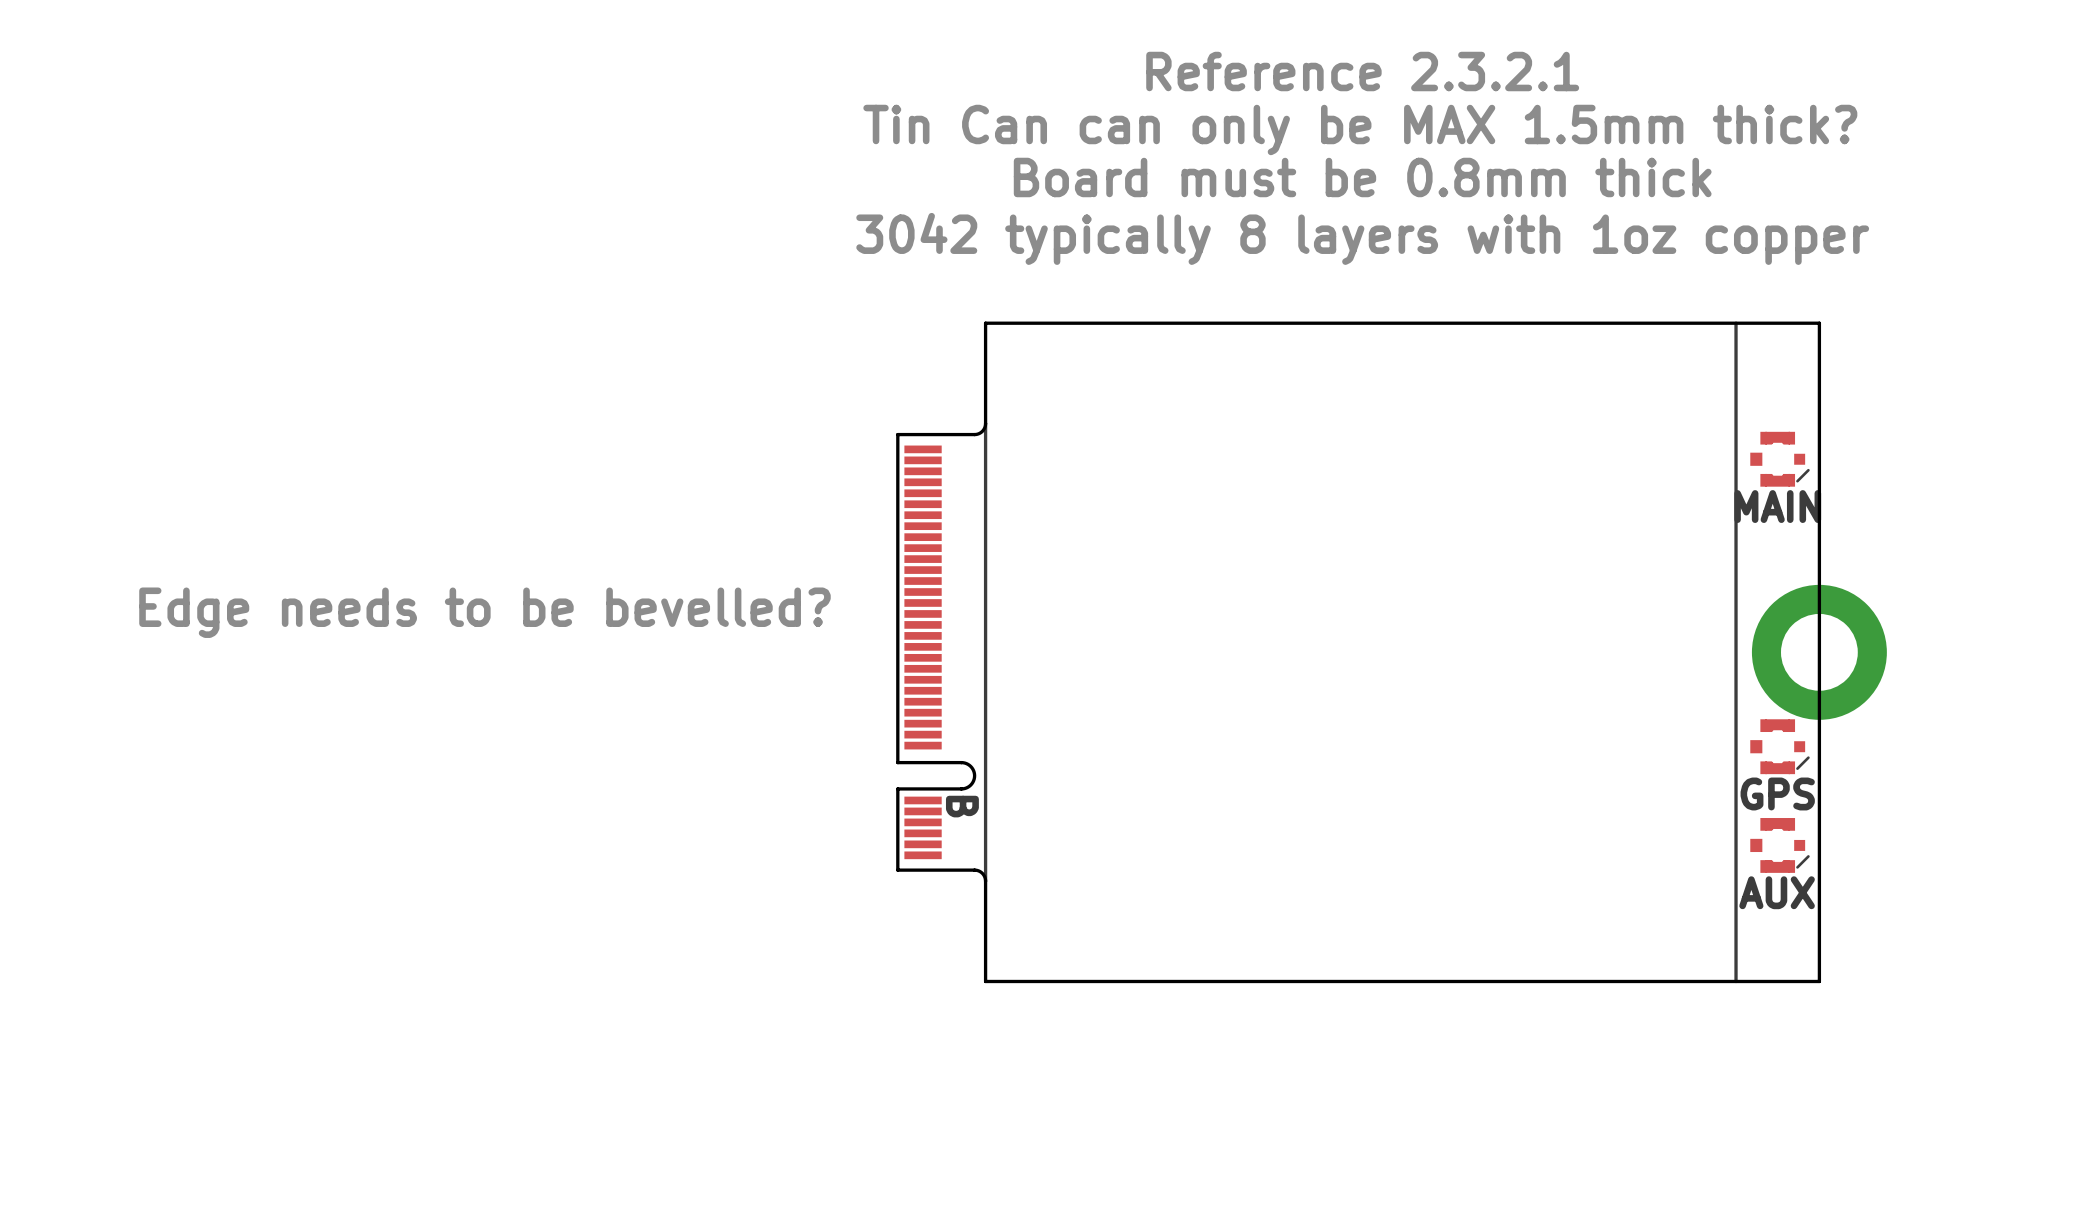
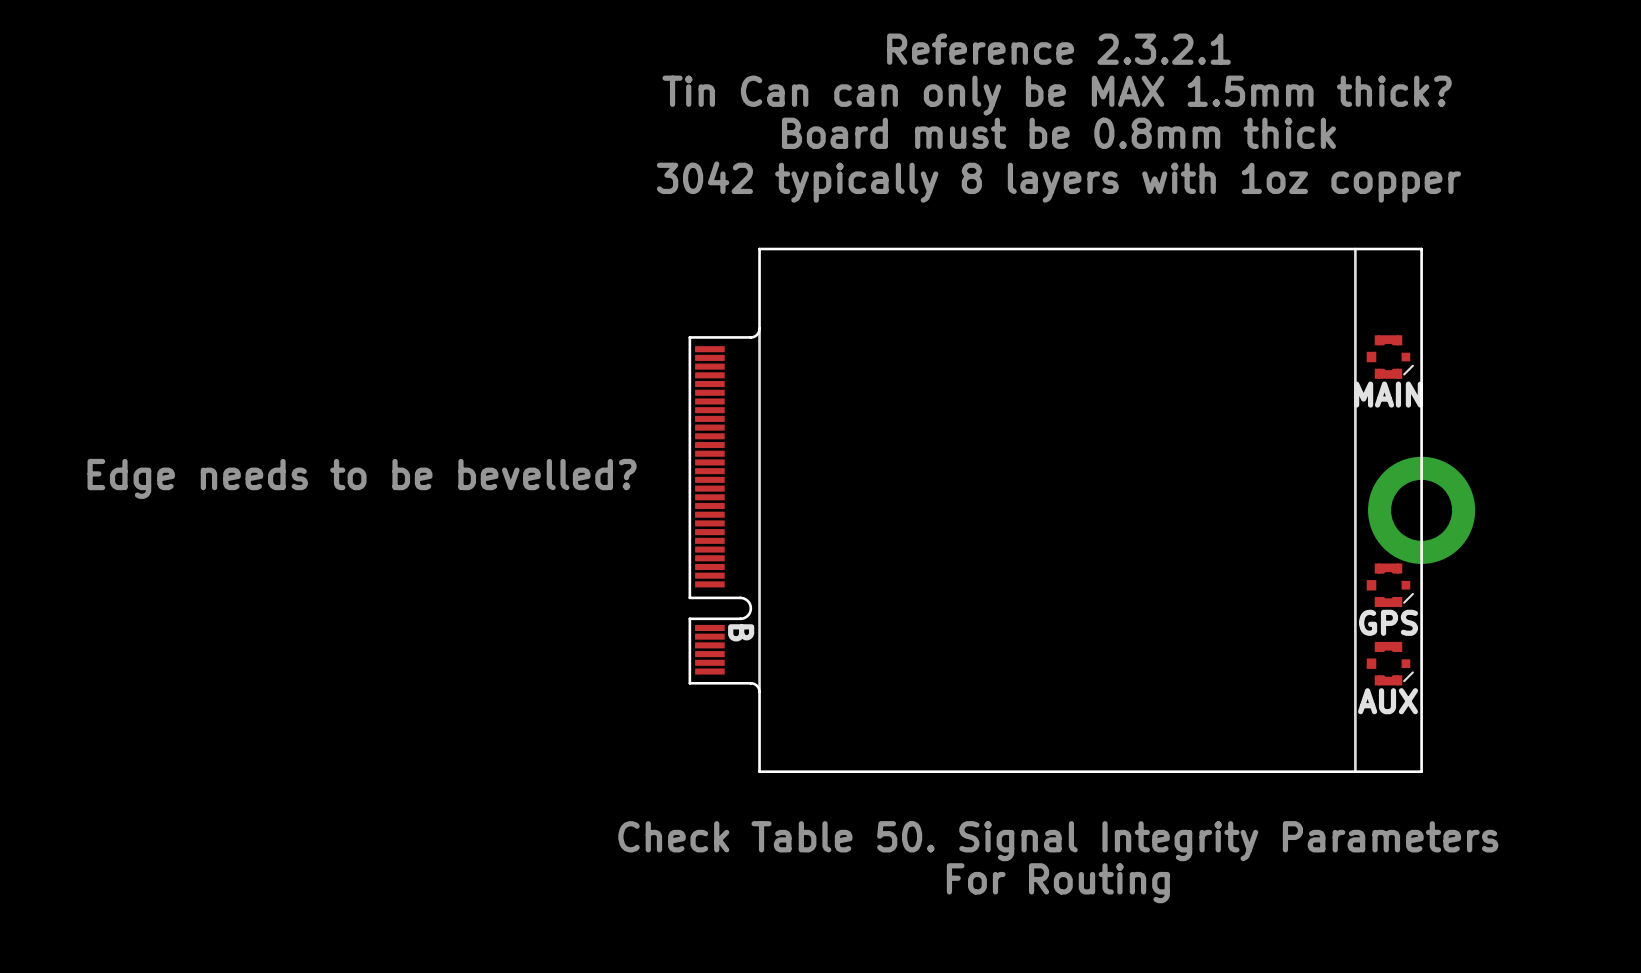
text: none -> Check Table 50. Signal Integrity Parameters (1058, 841)
text: none -> For Routing (1058, 883)

